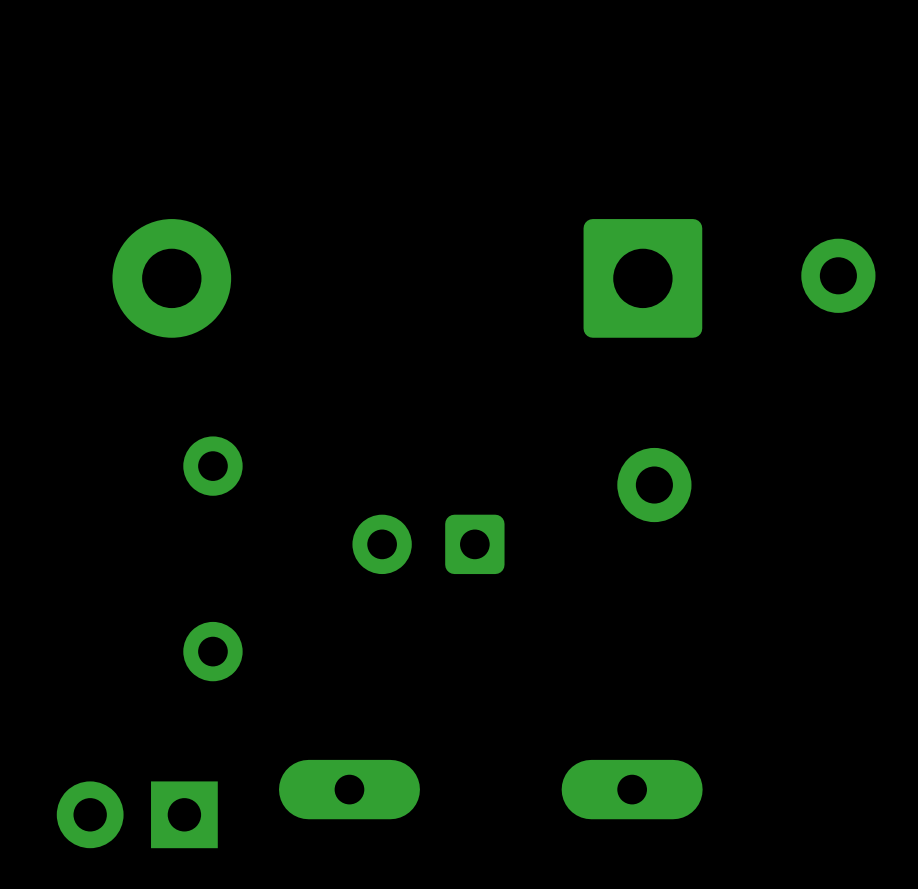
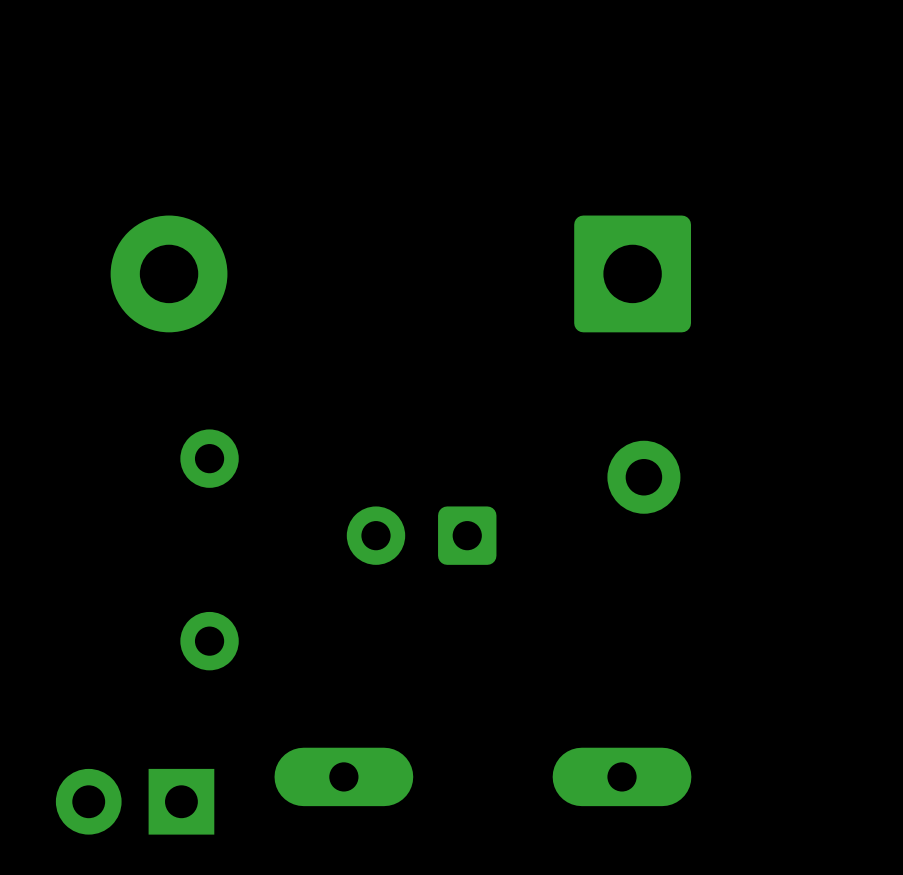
part: (838, 275) -> none

